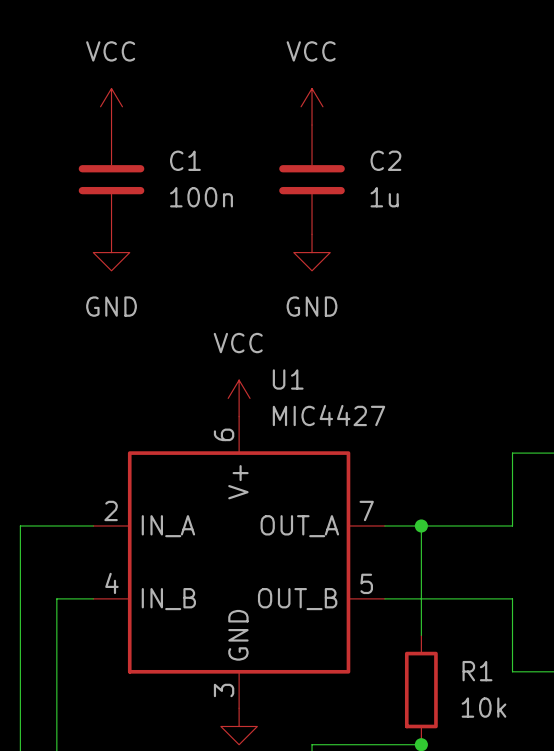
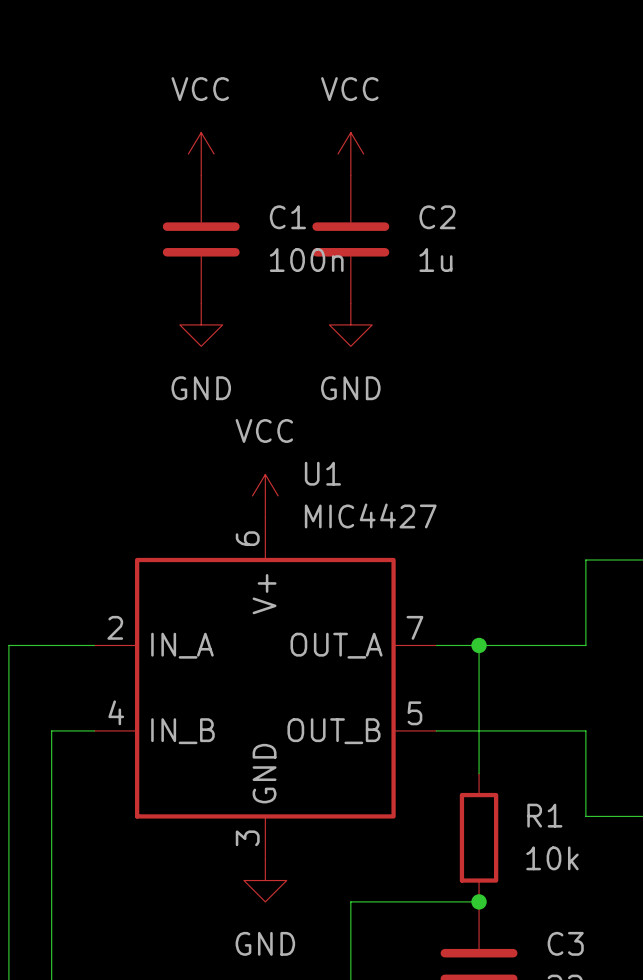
power symbol position: VCC (111, 106) -> VCC (201, 153)
C1 position: (111, 179) -> (201, 239)
power symbol position: GND (111, 252) -> GND (201, 324)

